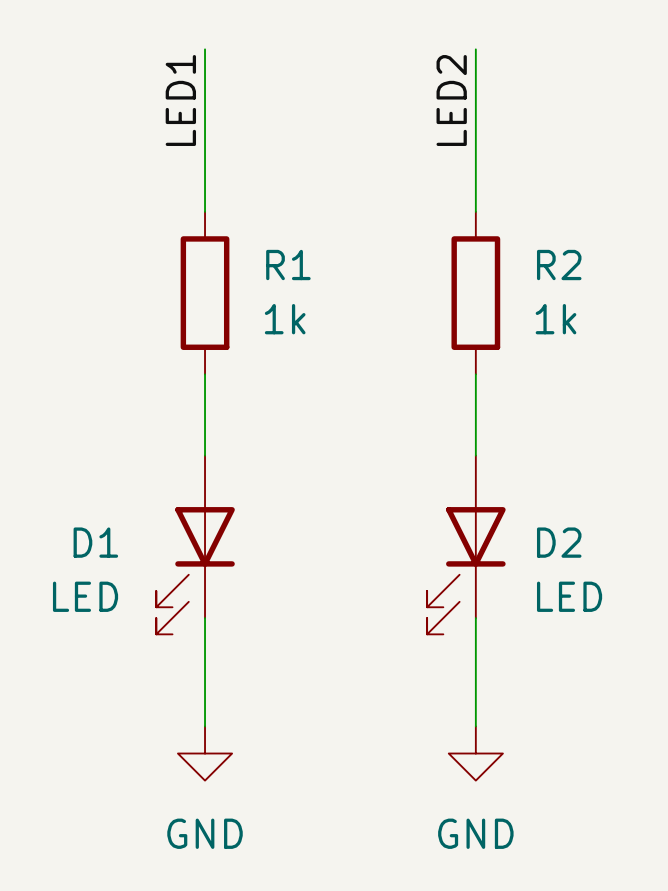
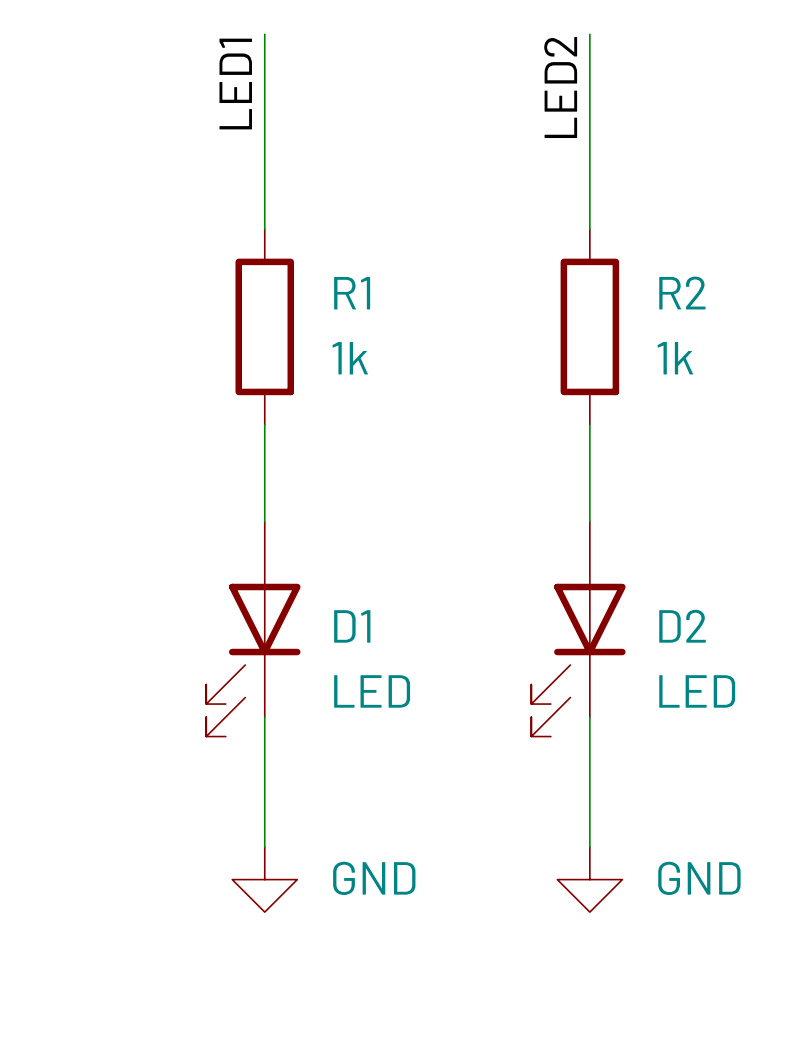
D1 name position: D1 (95, 542) -> D1 (352, 626)
D1 value position: LED (85, 596) -> LED (372, 691)
power symbol text position: GND (205, 833) -> GND (374, 878)
power symbol text position: GND (475, 833) -> GND (699, 878)

